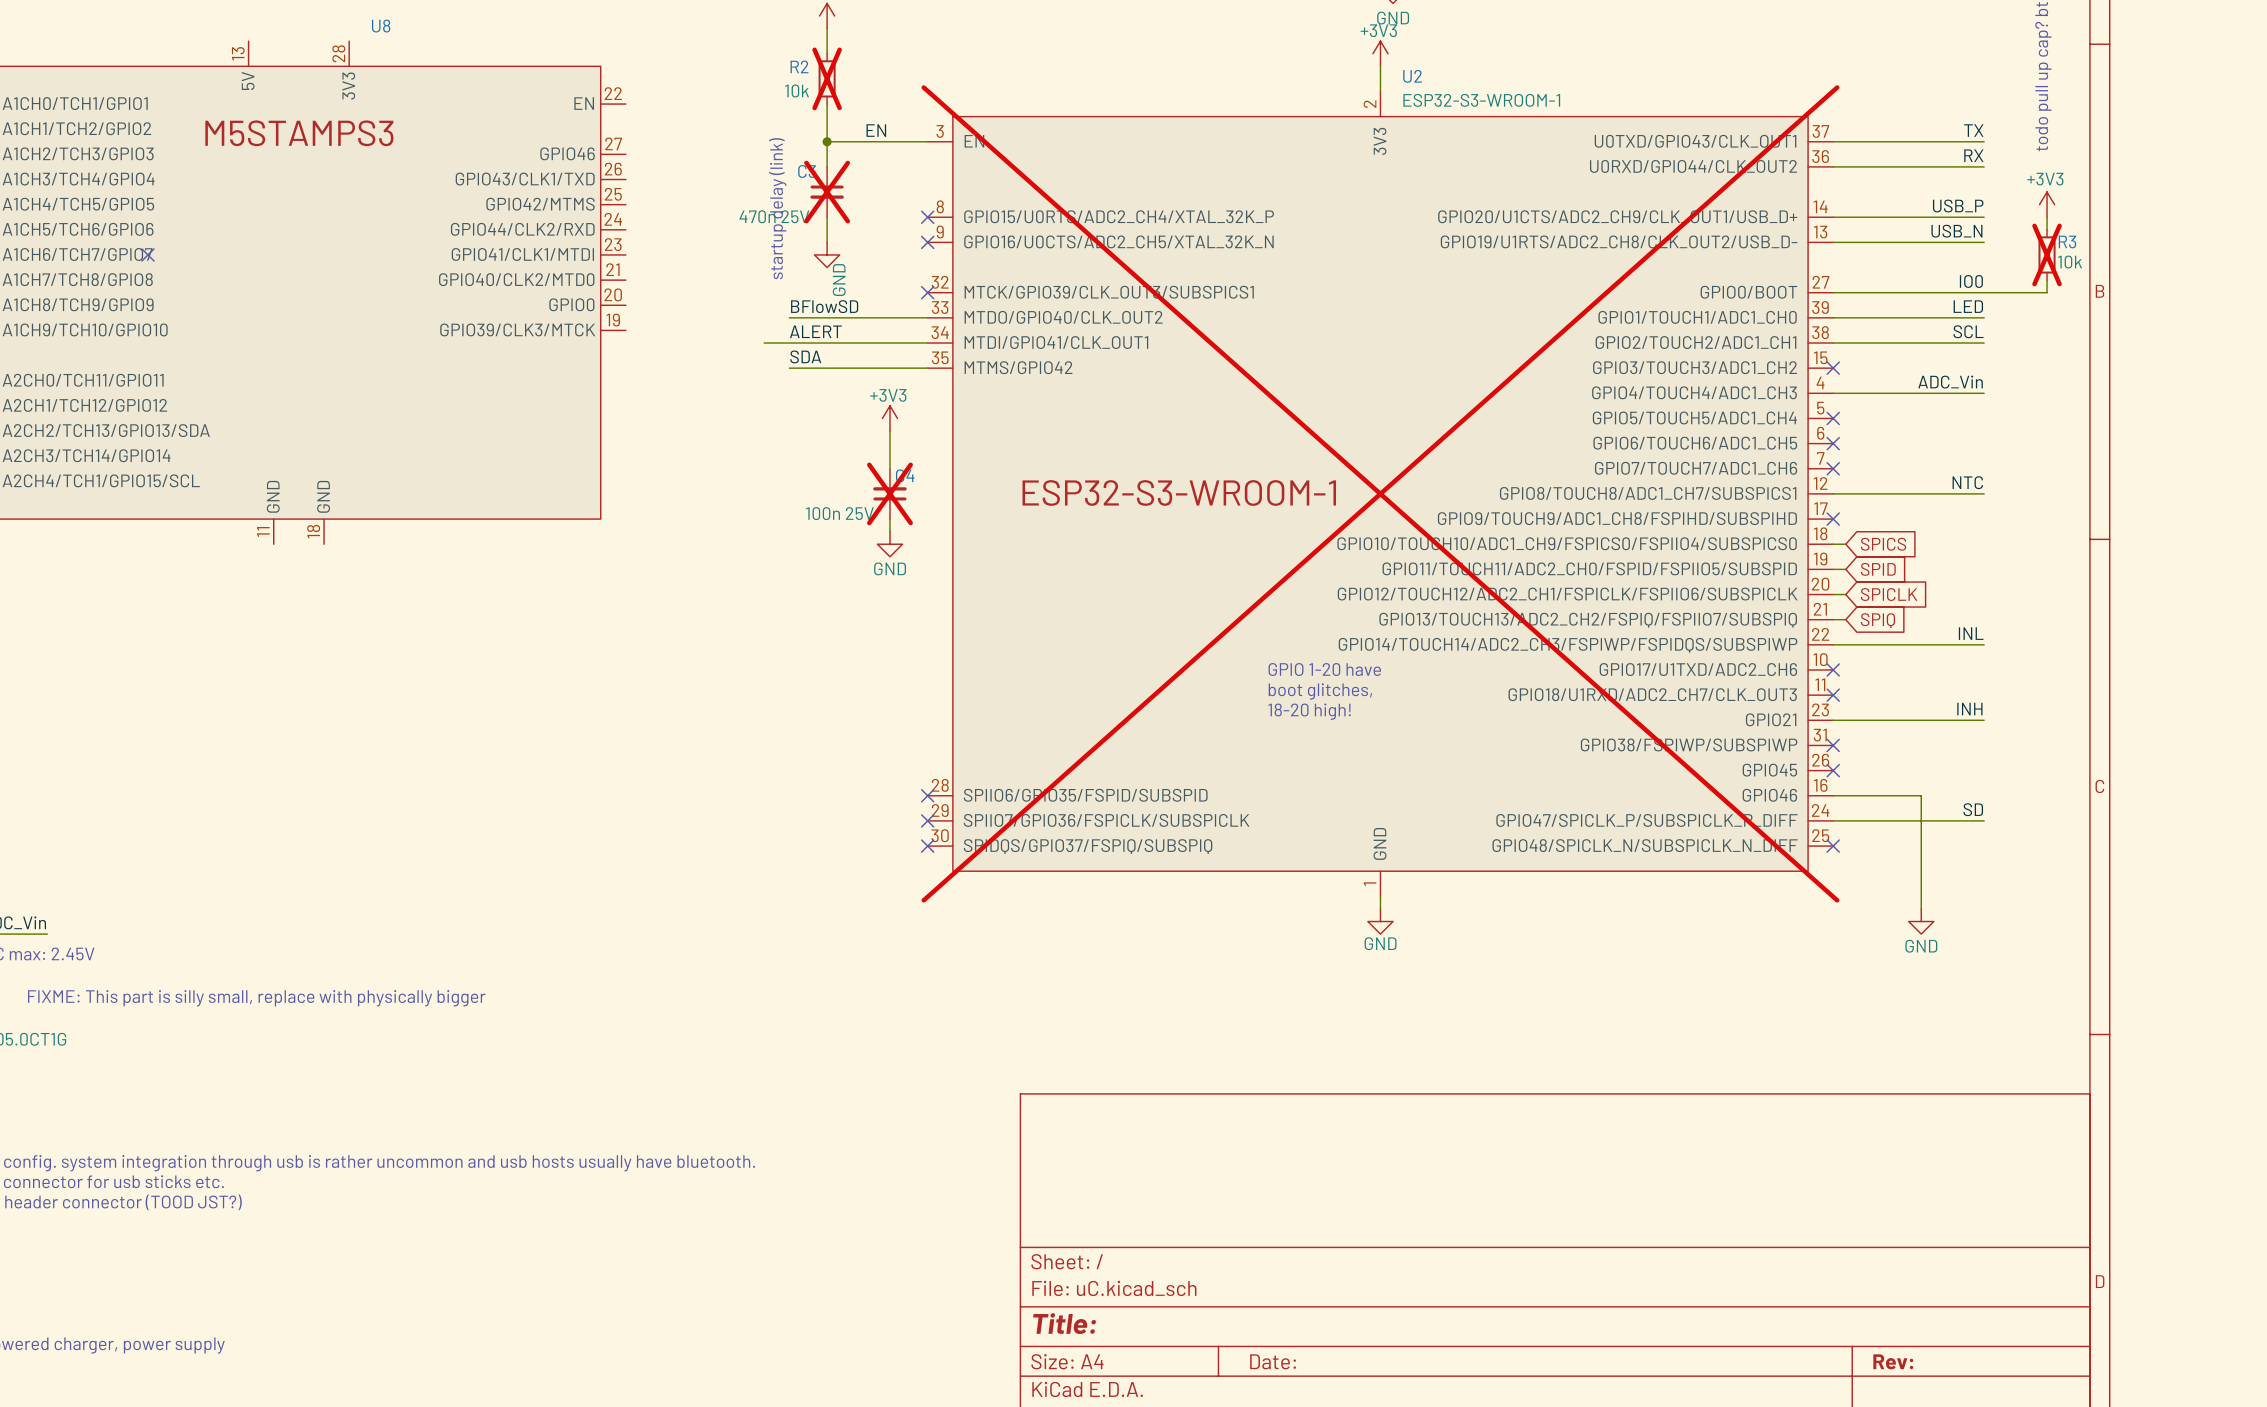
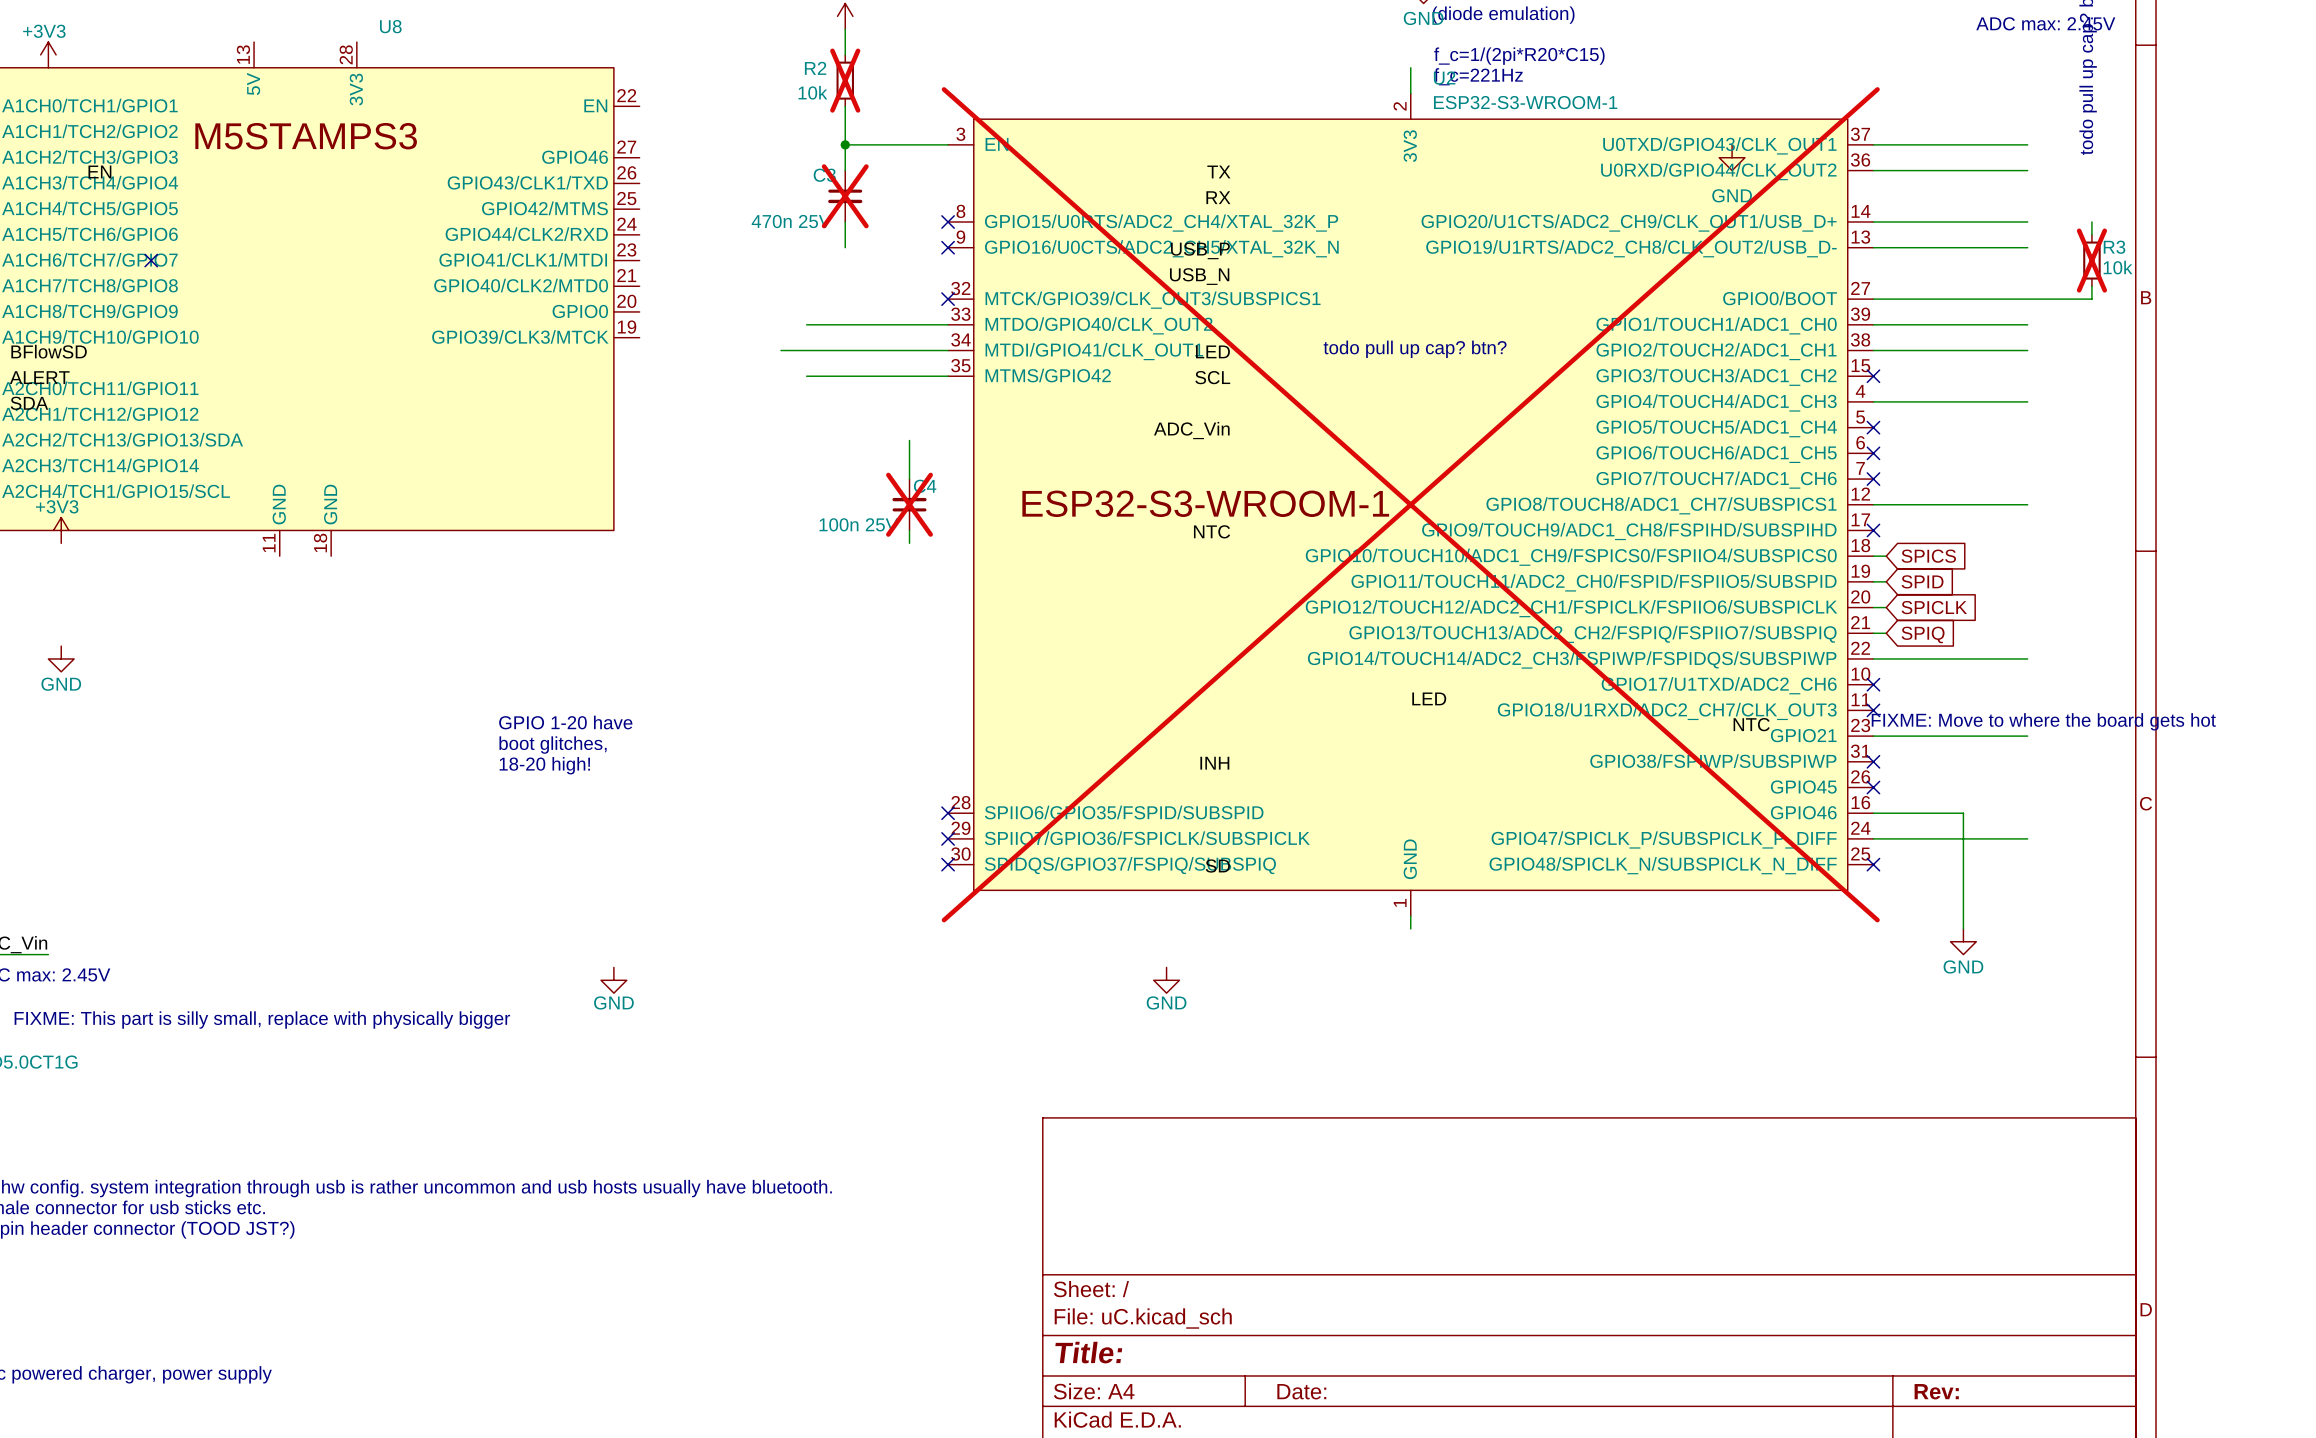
text: none -> (diode emulation) (1503, 15)
text: none -> ADC max: 2.45V (2045, 23)
power symbol: none -> +3V3 (48, 54)
power symbol: +3V3 (1380, 53) -> none
text: none -> f_c=1/(2pi*R20*C15) (1519, 56)
text: none -> f_c=221Hz (1478, 76)
label: EN (876, 130) -> none
label: TX (1973, 130) -> none
power symbol: none -> GND (1732, 157)
label: RX (1973, 155) -> none
label: none -> EN (99, 171)
label: none -> TX (1218, 171)
label: none -> RX (1218, 197)
power symbol: +3V3 (2047, 204) -> none
label: USB_P (1958, 206) -> none
text: startup delay (link) (777, 208) -> none
label: USB_N (1956, 231) -> none
label: none -> USB_P (1200, 250)
power symbol: GND (827, 254) -> none
label: none -> USB_N (1199, 276)
label: IO0 (1971, 281) -> none
label: BFlowSD (824, 306) -> none
label: LED (1968, 306) -> none
label: ALERT (815, 331) -> none
label: SCL (1968, 331) -> none
text: none -> todo pull up cap? btn? (1415, 349)
label: none -> BFlowSD (49, 351)
label: none -> LED (1212, 351)
label: SDA (805, 356) -> none
label: none -> ALERT (39, 377)
label: none -> SCL (1212, 377)
label: ADC_Vin (1950, 382) -> none
label: none -> SDA (29, 403)
power symbol: +3V3 (889, 418) -> none
label: none -> ADC_Vin (1191, 430)
label: NTC (1967, 482) -> none
power symbol: none -> +3V3 (61, 530)
label: none -> NTC (1212, 531)
power symbol: GND (889, 544) -> none
label: INL (1971, 633) -> none
power symbol: none -> GND (61, 658)
text: GPIO 1-20 have (1324, 669) -> none
label: none -> LED (1429, 698)
text: boot glitches, (1320, 691) -> none
text: none -> FIXME: Move to where the board gets hot (2043, 721)
text: none -> GPIO 1-20 have (565, 722)
label: none -> NTC (1751, 724)
label: INH (1969, 709) -> none
text: 18-20 high! (1309, 711) -> none
text: none -> boot glitches, (553, 745)
label: none -> INH (1214, 763)
text: none -> 18-20 high! (544, 765)
label: SD (1973, 809) -> none
label: none -> SD (1217, 866)
power symbol position: GND (1380, 921) -> GND (1166, 980)
power symbol: none -> GND (613, 980)

